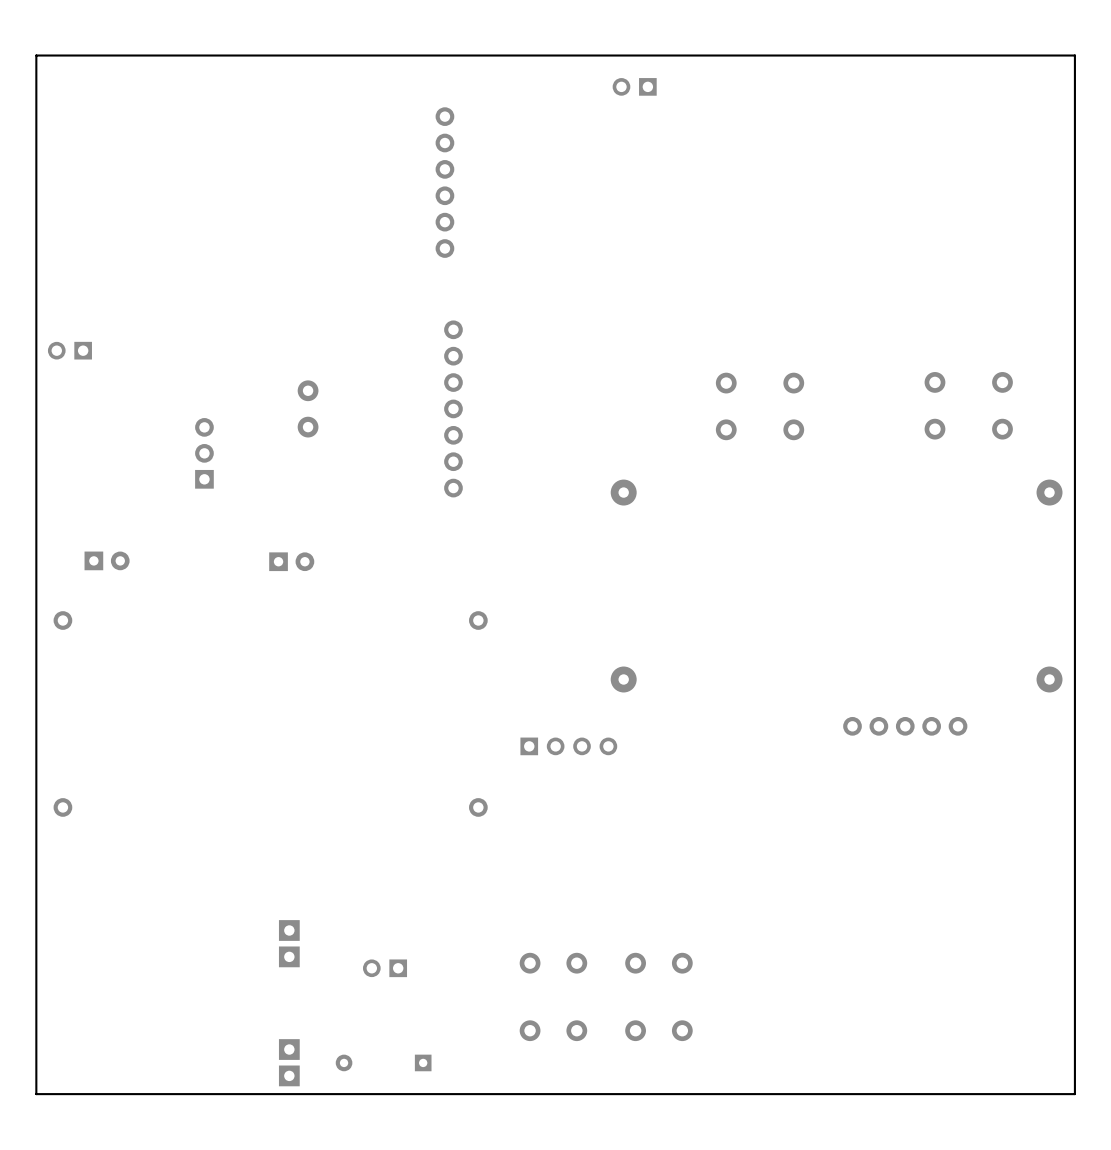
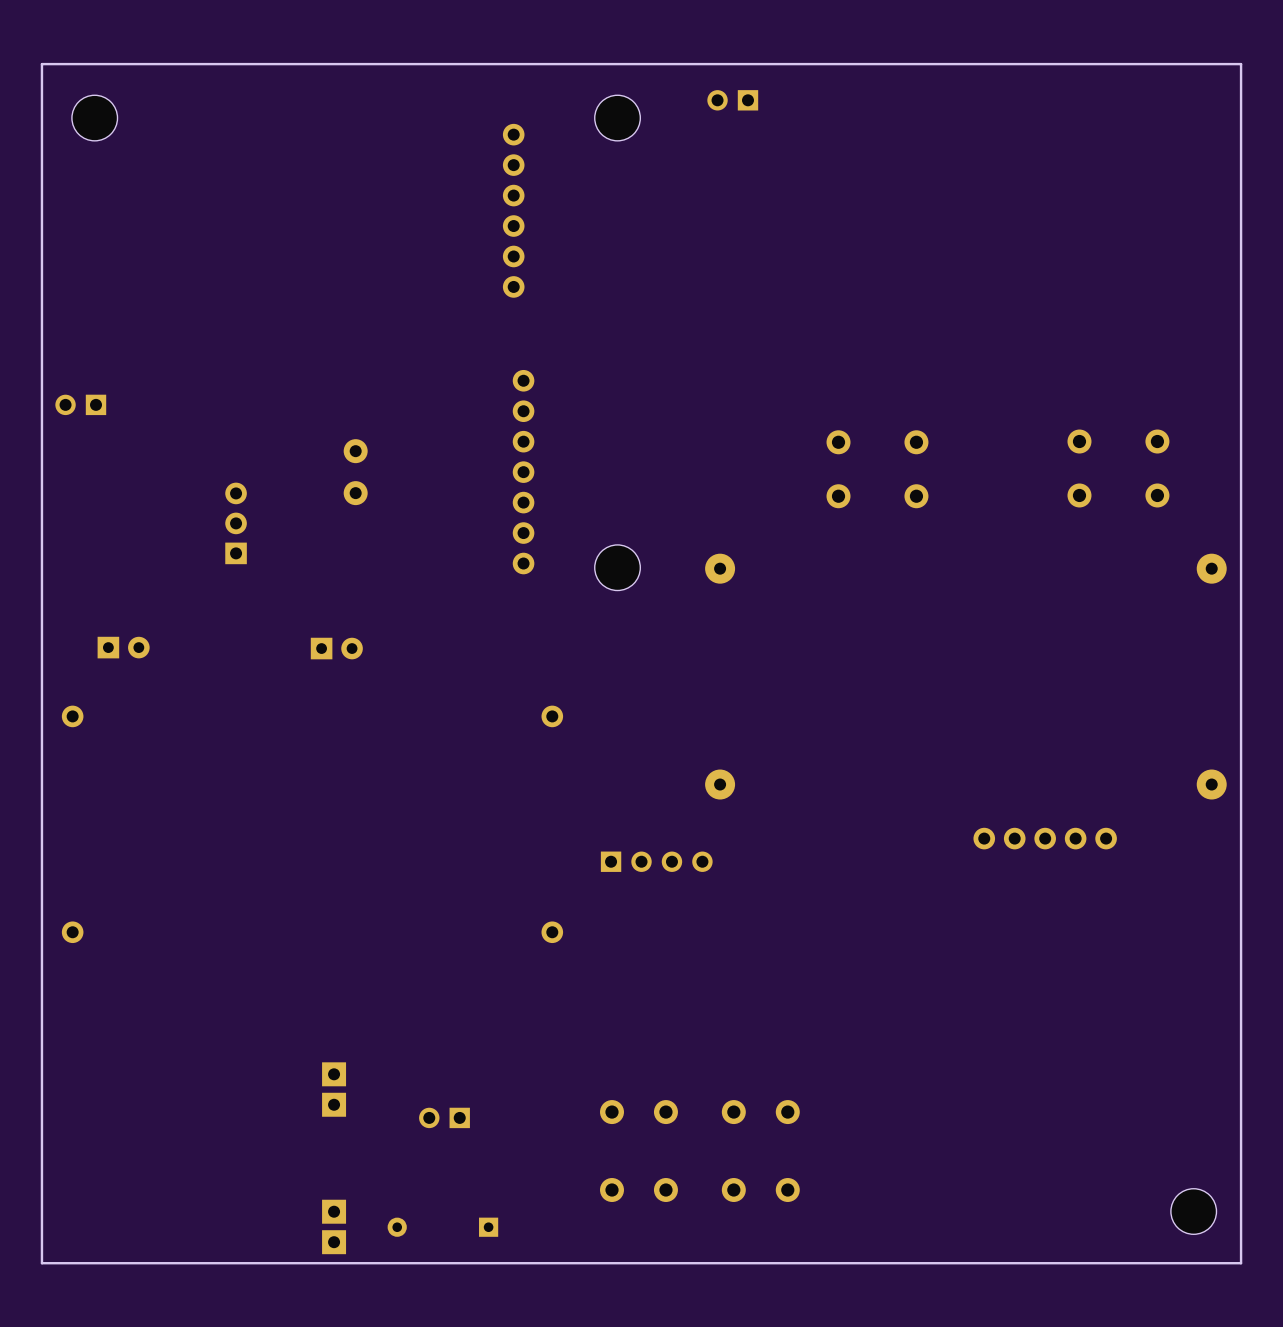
part: none -> (94, 118)
part: none -> (617, 118)
part: none -> (617, 567)
part: none -> (1193, 1211)

